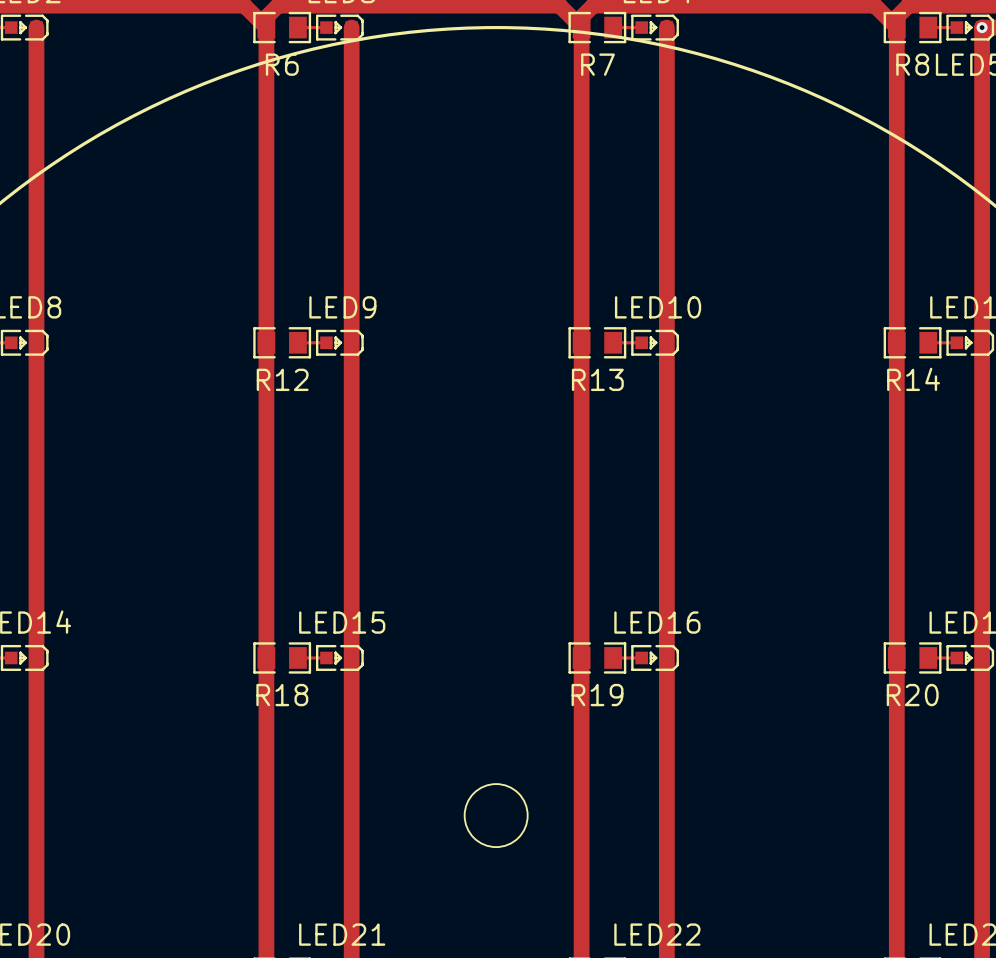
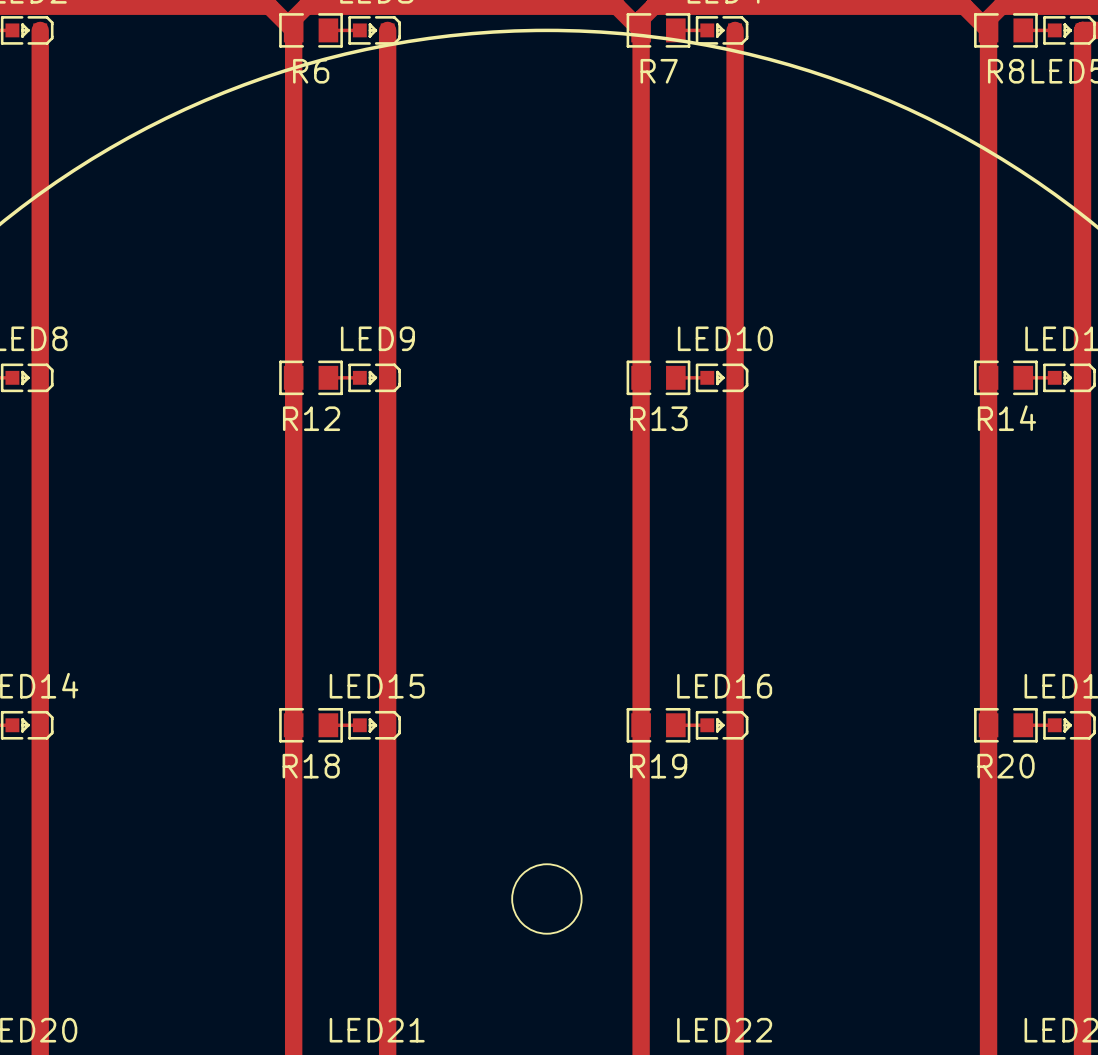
via: (982, 27) -> none

